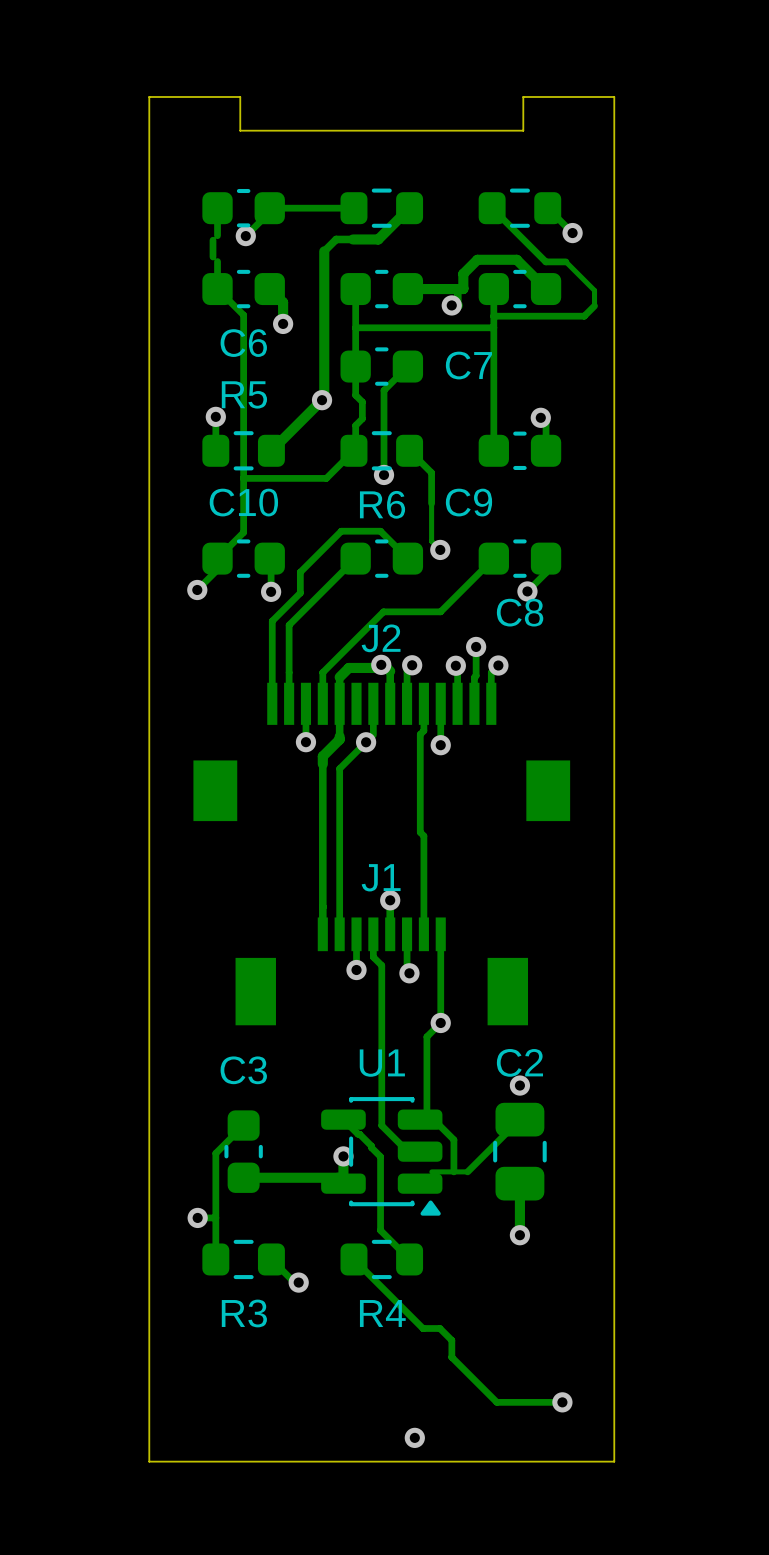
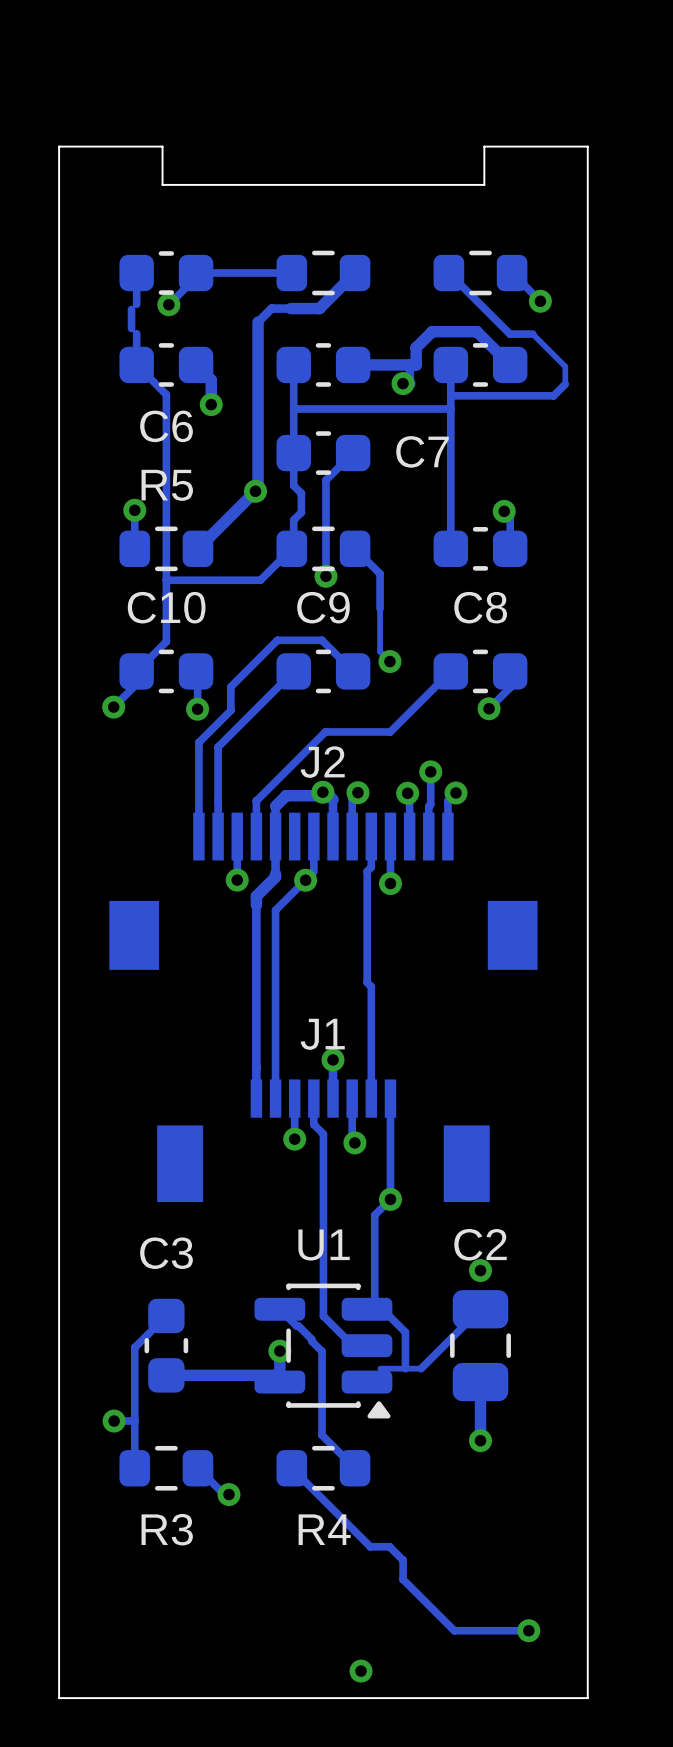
C9 name position: C9 (468, 502) -> C9 (323, 607)
R6 name: R6 (382, 504) -> none
C8 name position: C8 (520, 612) -> C8 (480, 607)

